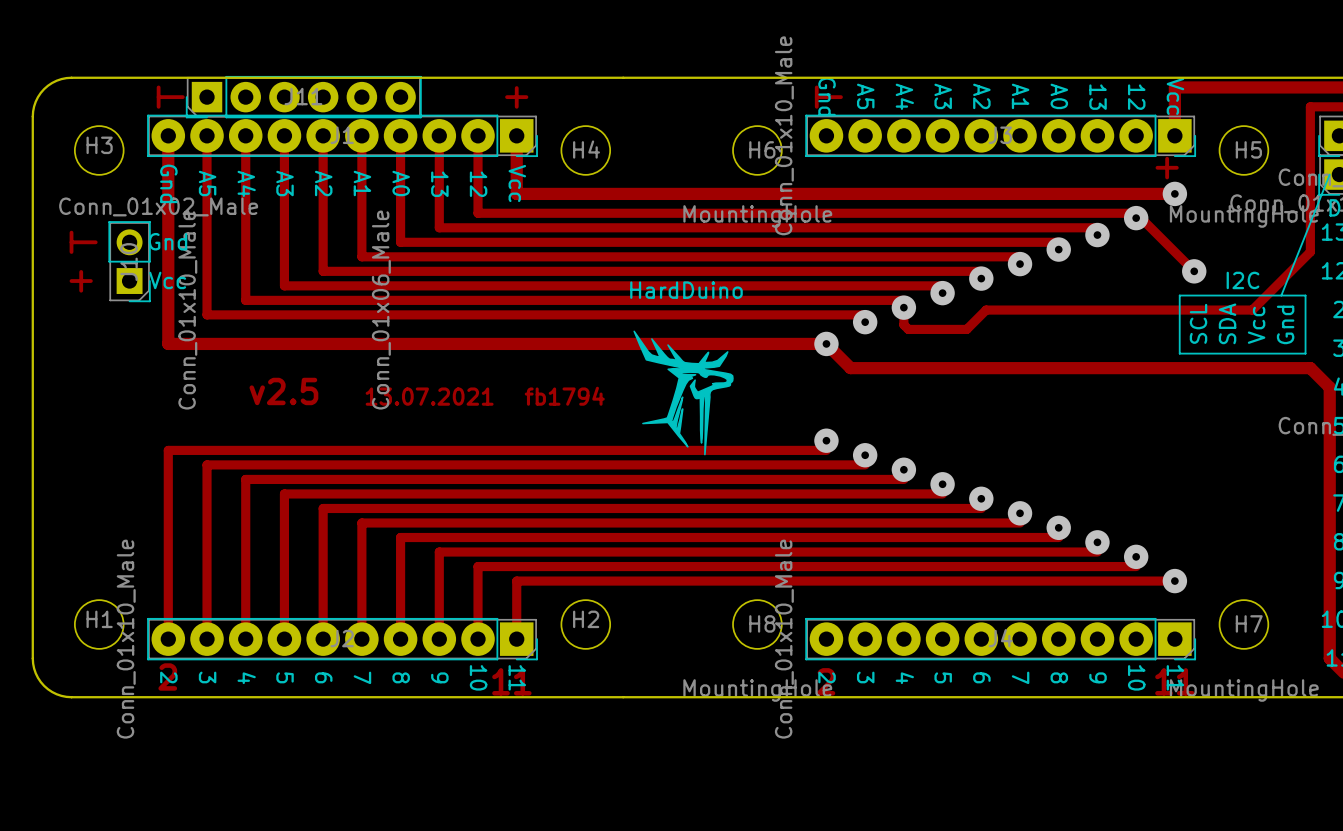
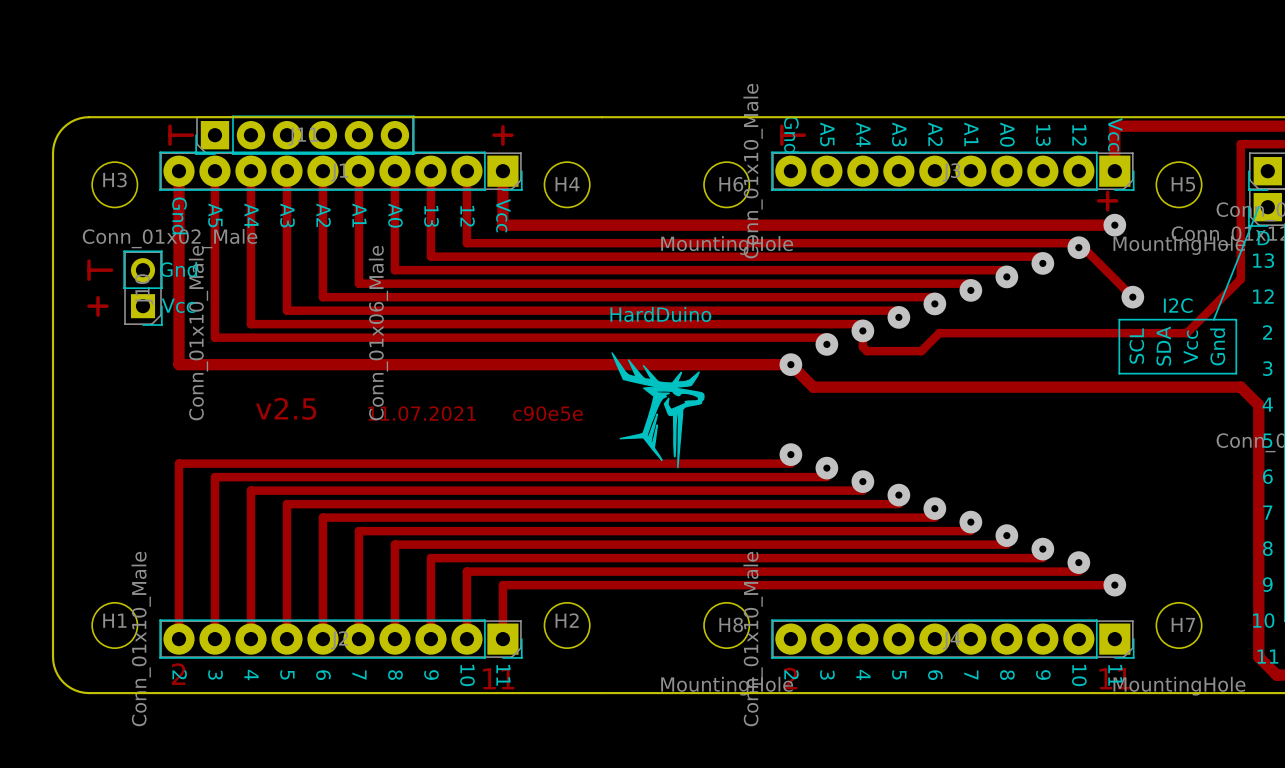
text: 13.07.2021 (429, 396) -> 11.07.2021 (422, 413)
text: fb1794 (564, 396) -> c90e5e (547, 413)

